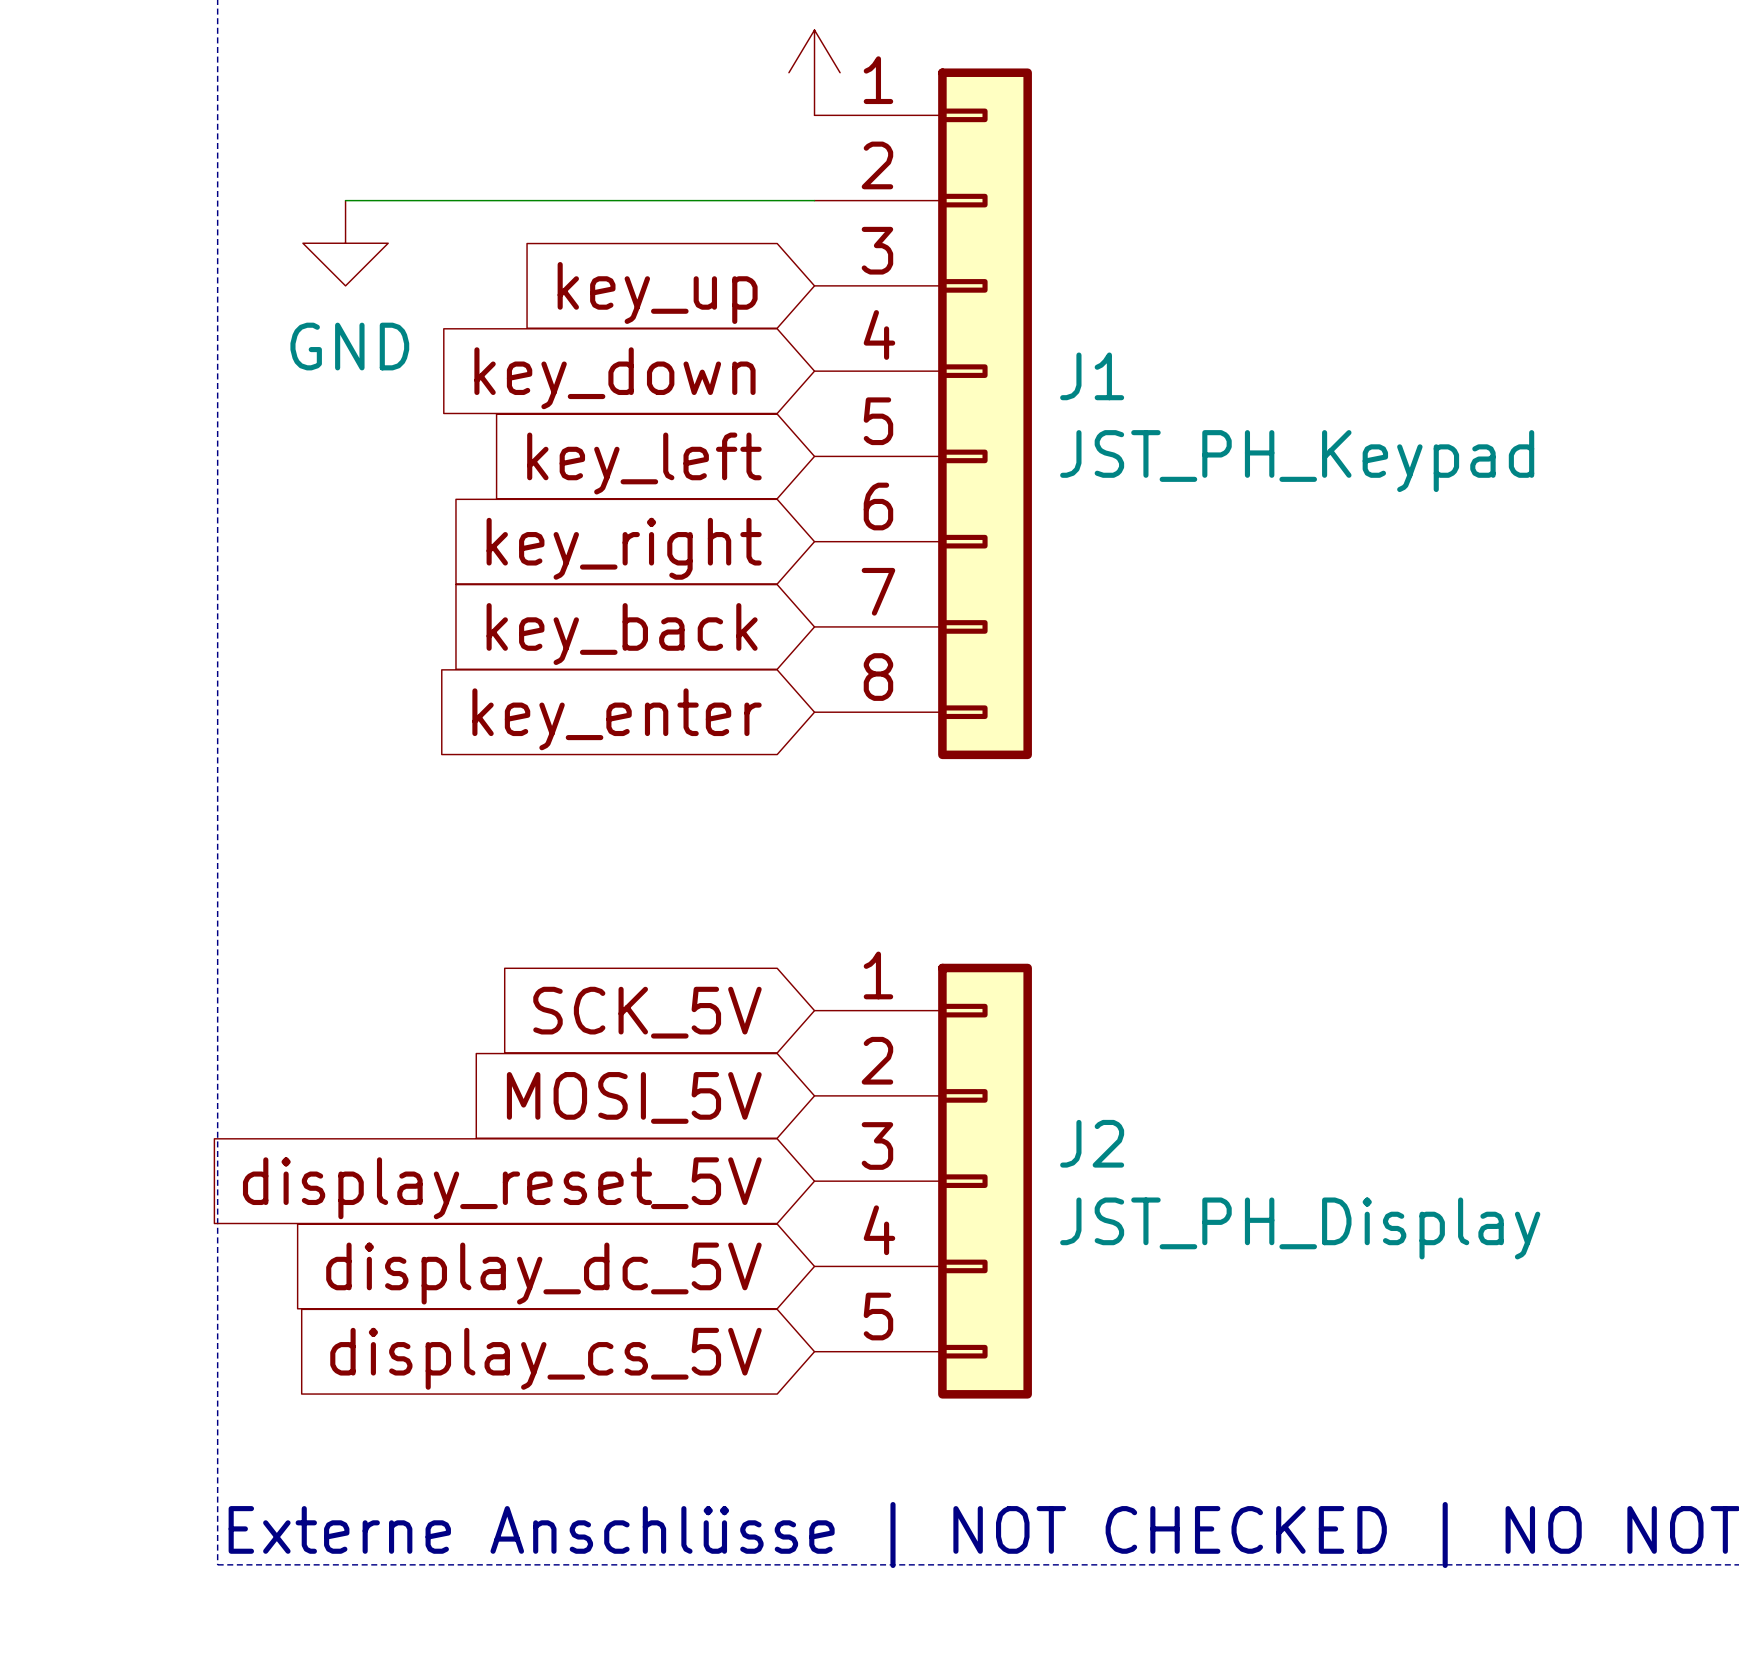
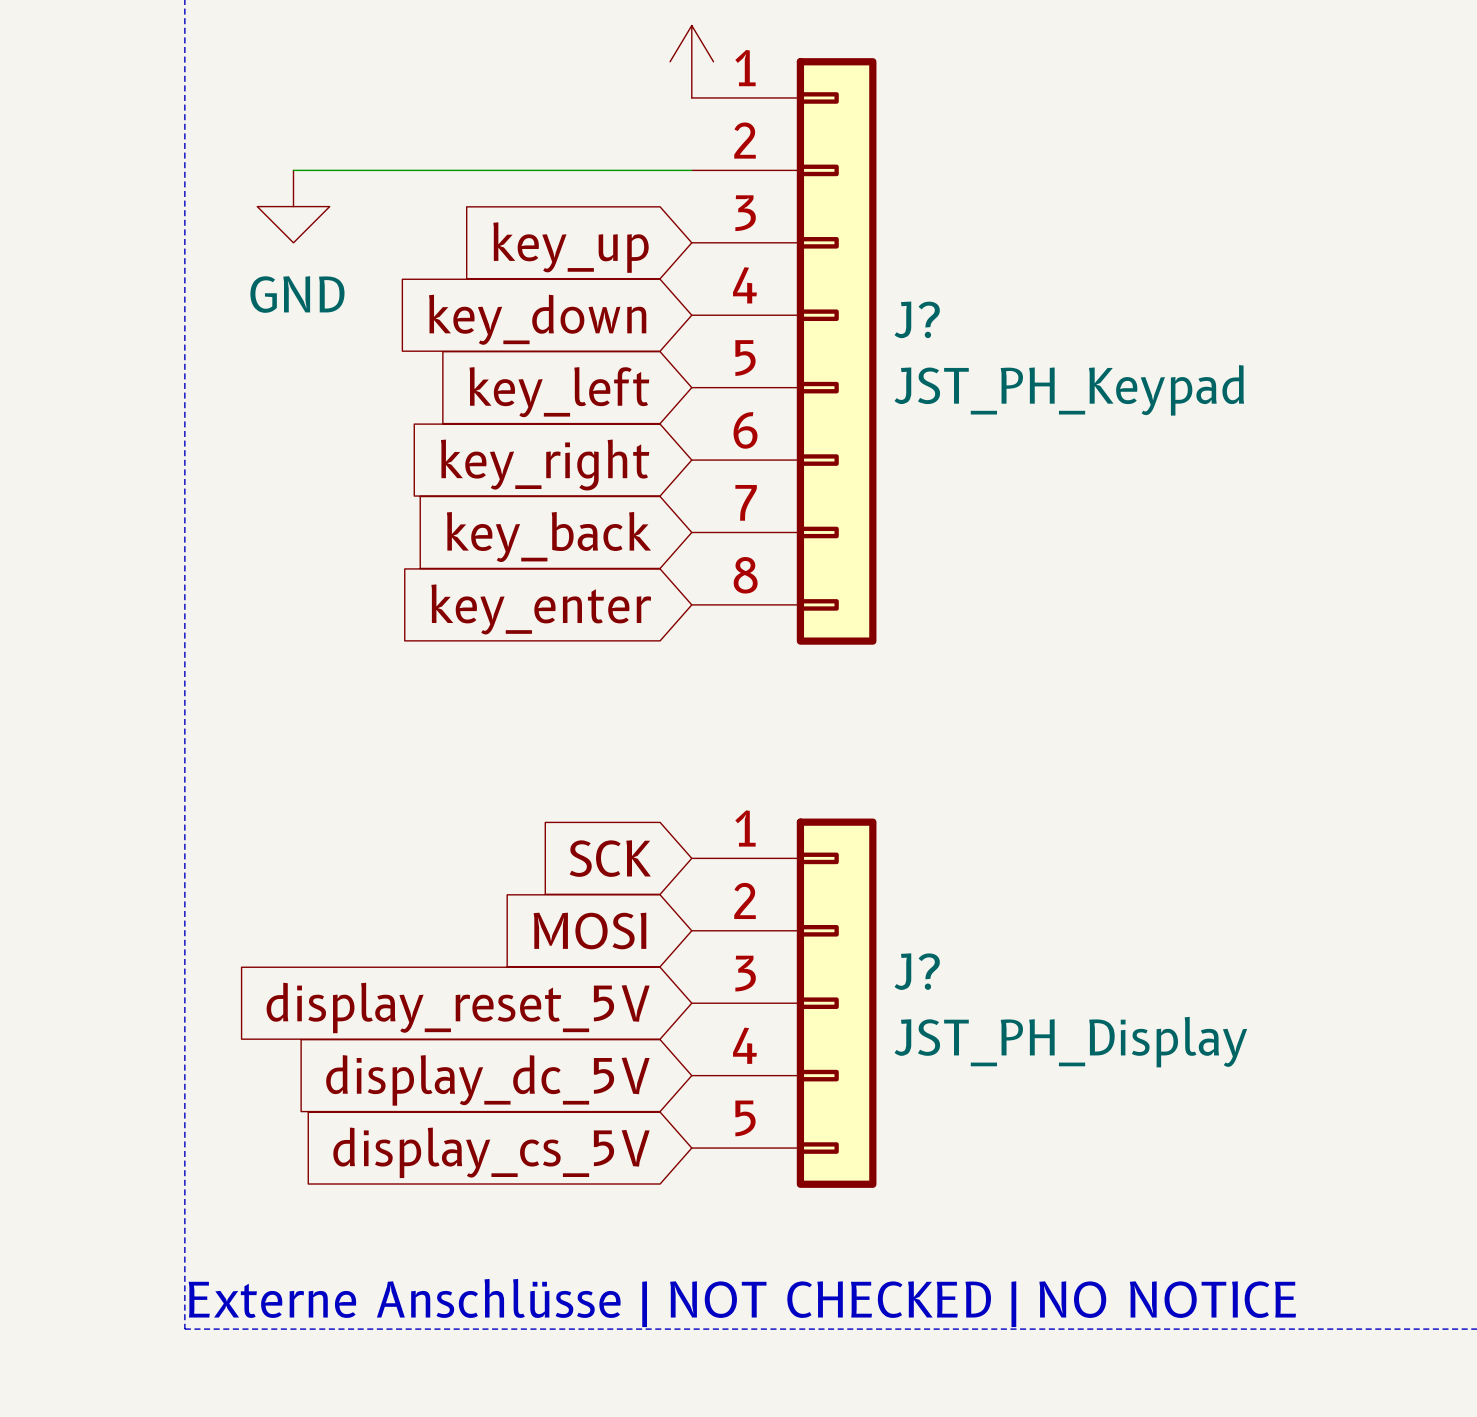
J1 name: J1 (1092, 376) -> J? (917, 319)
global label: SCK_5V (647, 1012) -> SCK (610, 858)
global label: MOSI_5V (634, 1097) -> MOSI (589, 930)
J2 name: J2 (1092, 1143) -> J? (917, 971)

